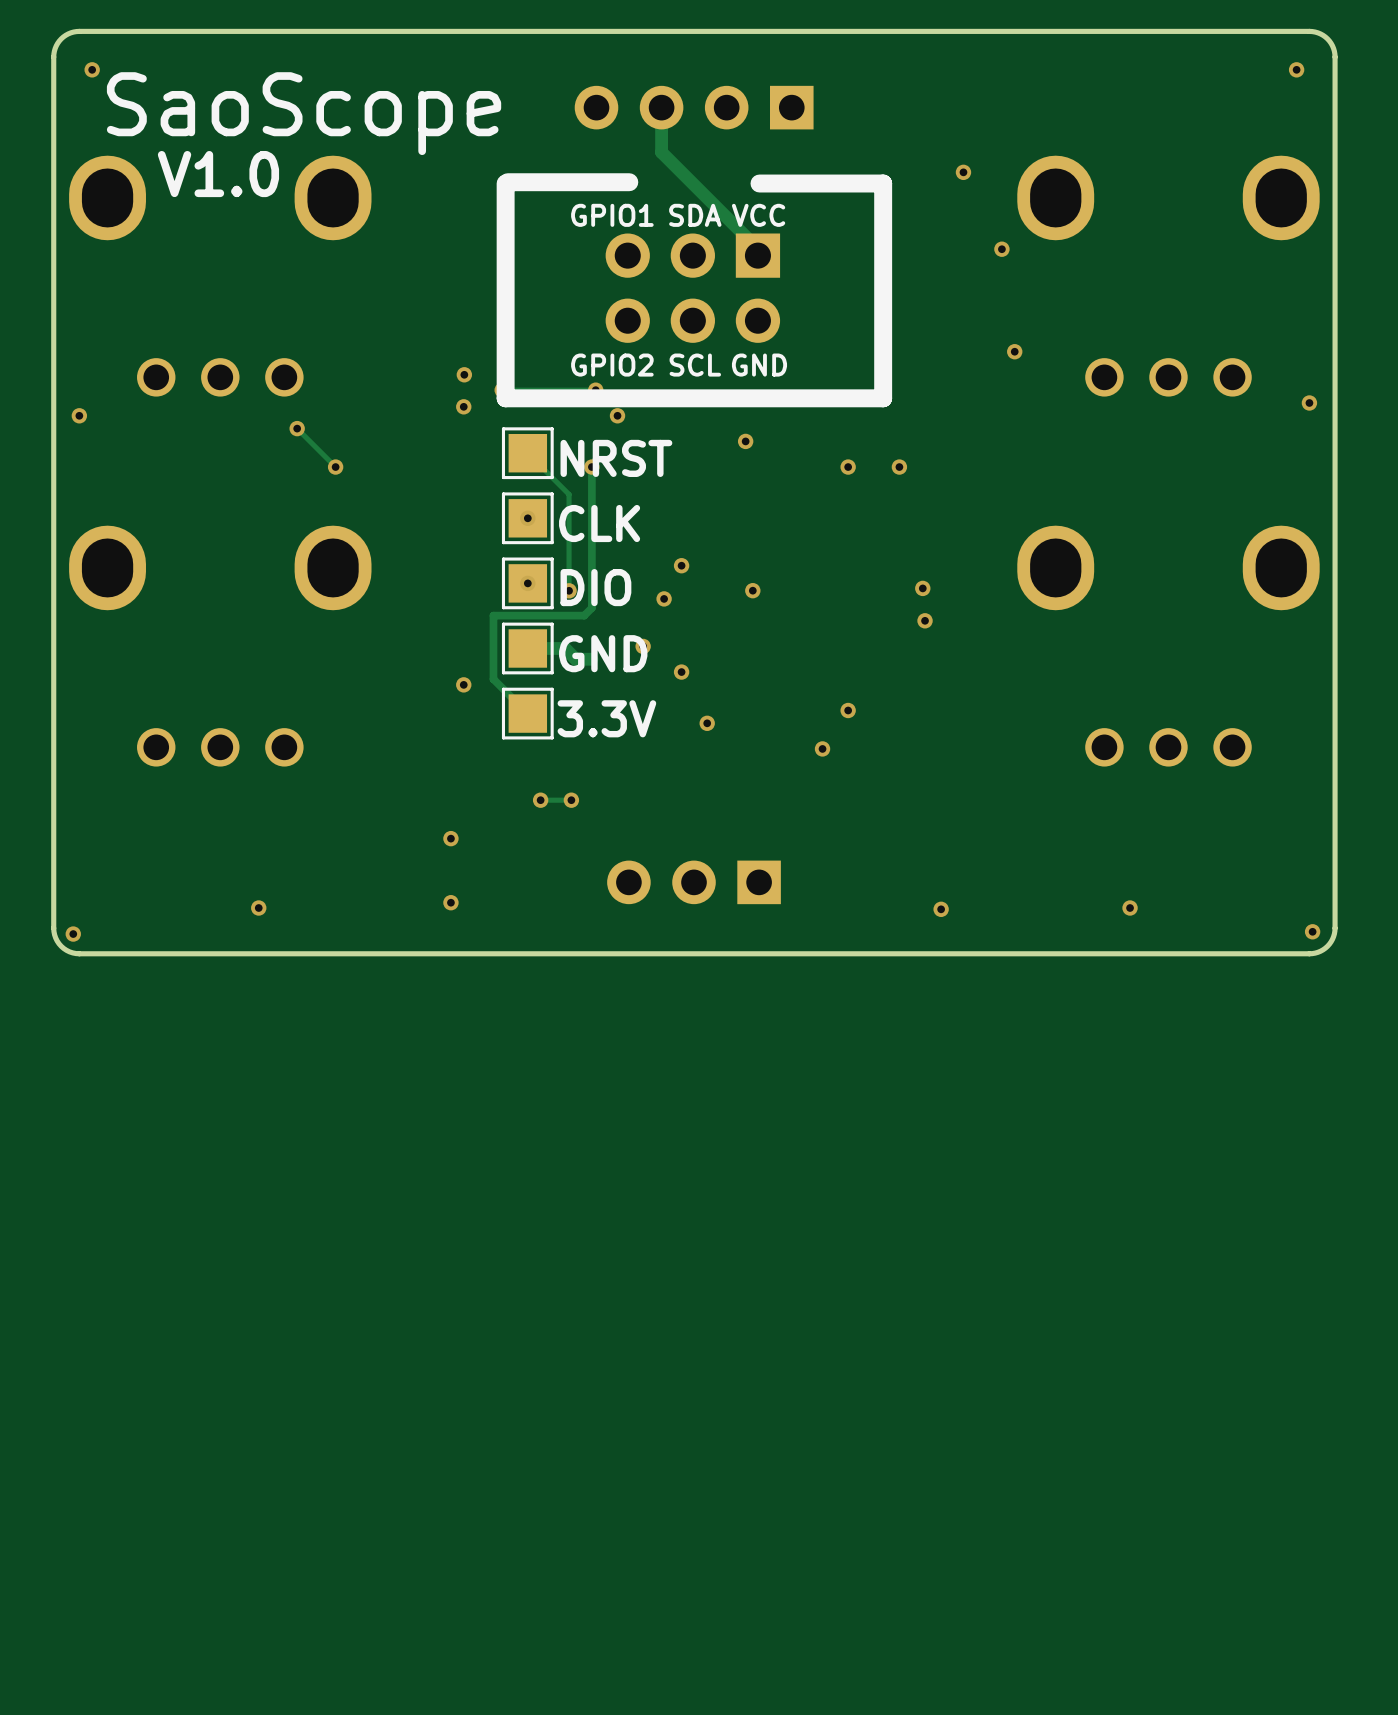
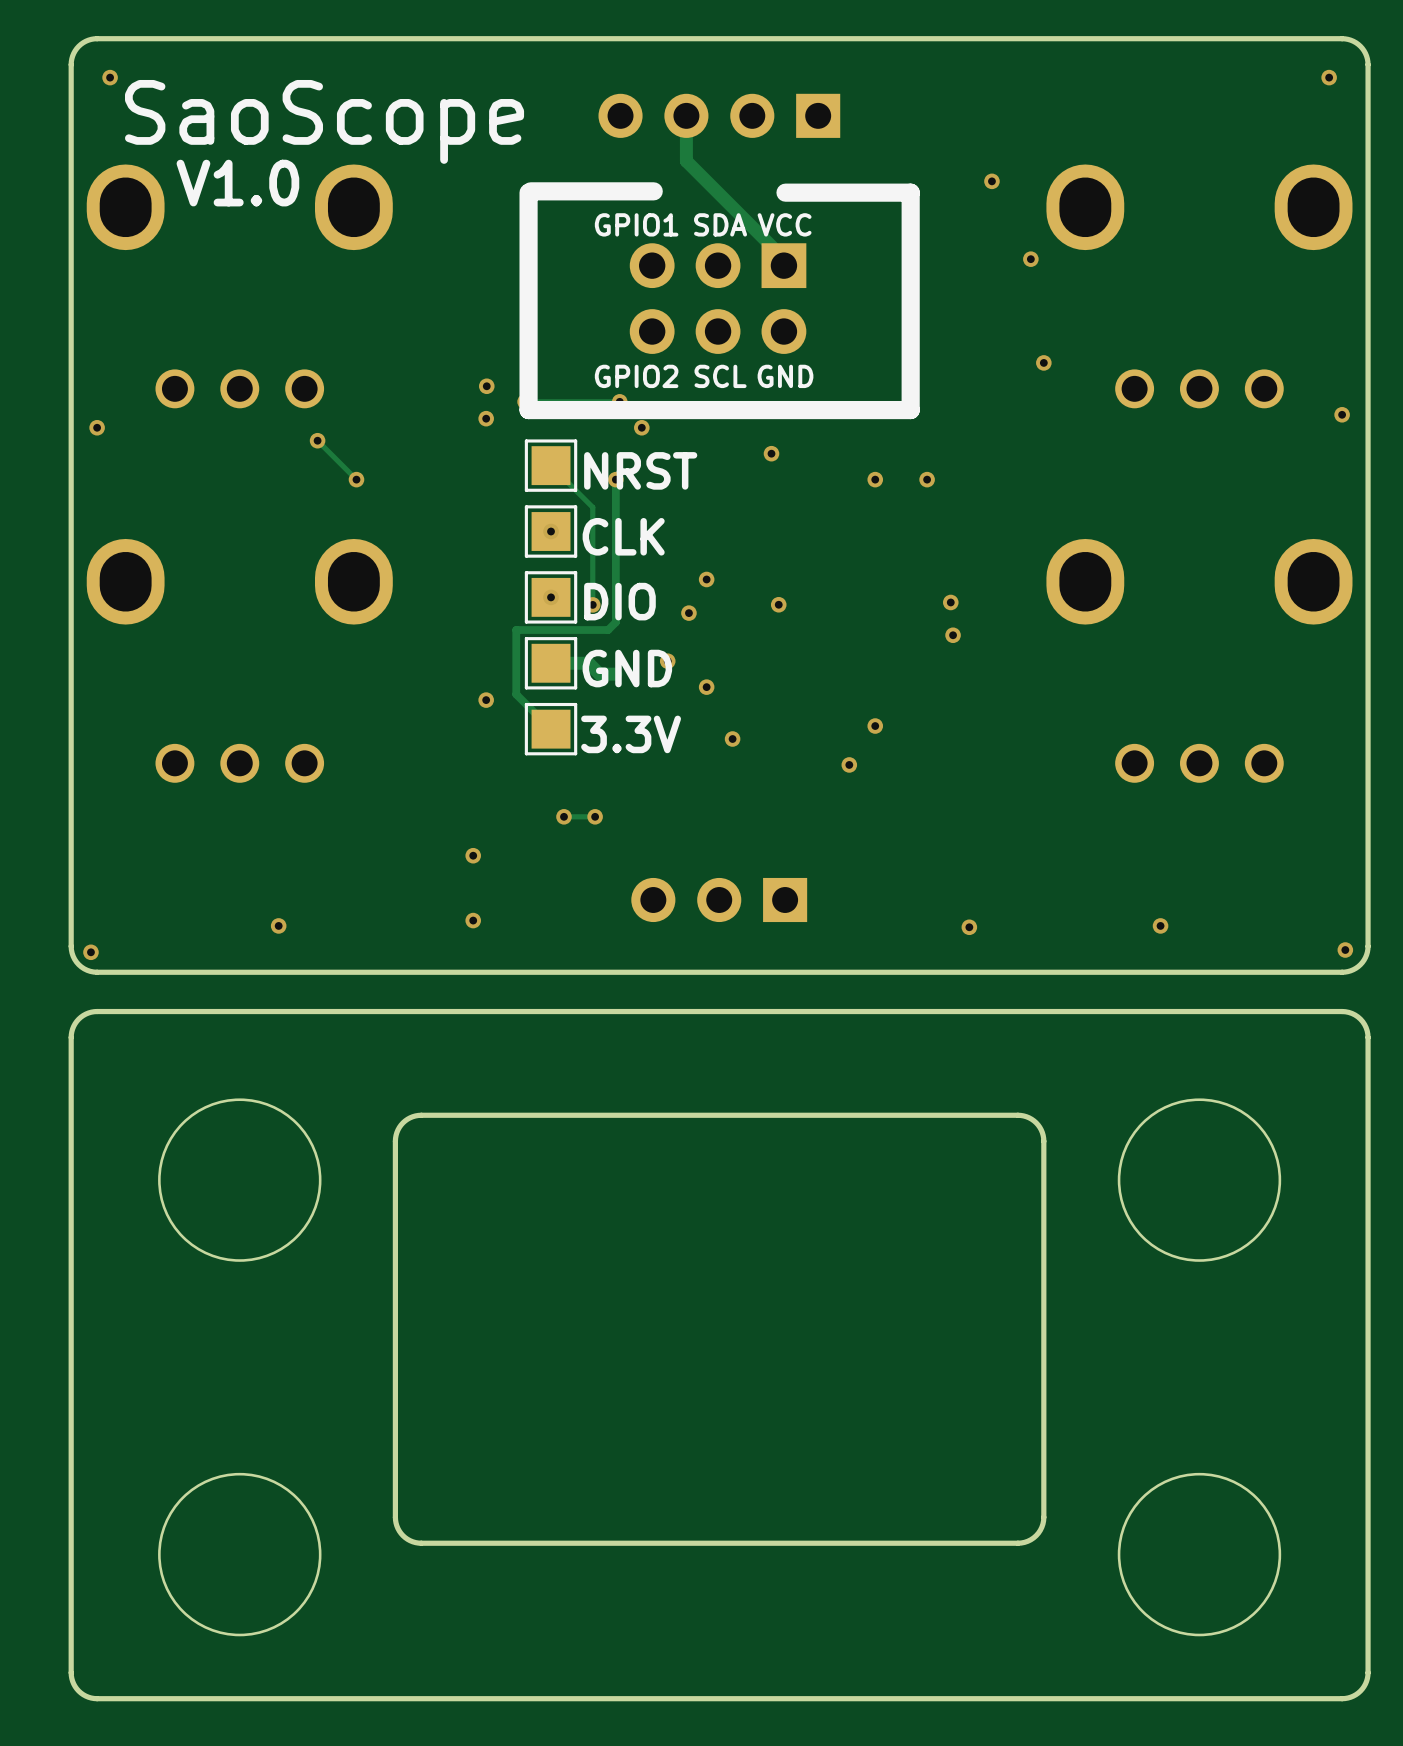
board edge: none -> (1342, 1011) (97, 1011) (85, 1014) (75, 1023) (71, 1037) (71, 1672) (73, 1684) (83, 1694) (97, 1698) (1342, 1698) (1353, 1696) (1364, 1686) (1368, 1672) (1368, 1037) (1366, 1027) (1360, 1019) (1352, 1013) (1342, 1011)
round board edge: none -> [158, 1098, 322, 1262]
round board edge: none -> [1117, 1098, 1282, 1262]
board edge: none -> (1017, 1115) (421, 1115) (407, 1119) (399, 1127) (395, 1141) (395, 1517) (399, 1531) (410, 1540) (421, 1543) (1017, 1543) (1033, 1537) (1041, 1527) (1043, 1517) (1043, 1141) (1042, 1132) (1036, 1122) (1029, 1117) (1017, 1115)
round board edge: none -> [158, 1472, 322, 1637]
round board edge: none -> [1117, 1472, 1282, 1637]

